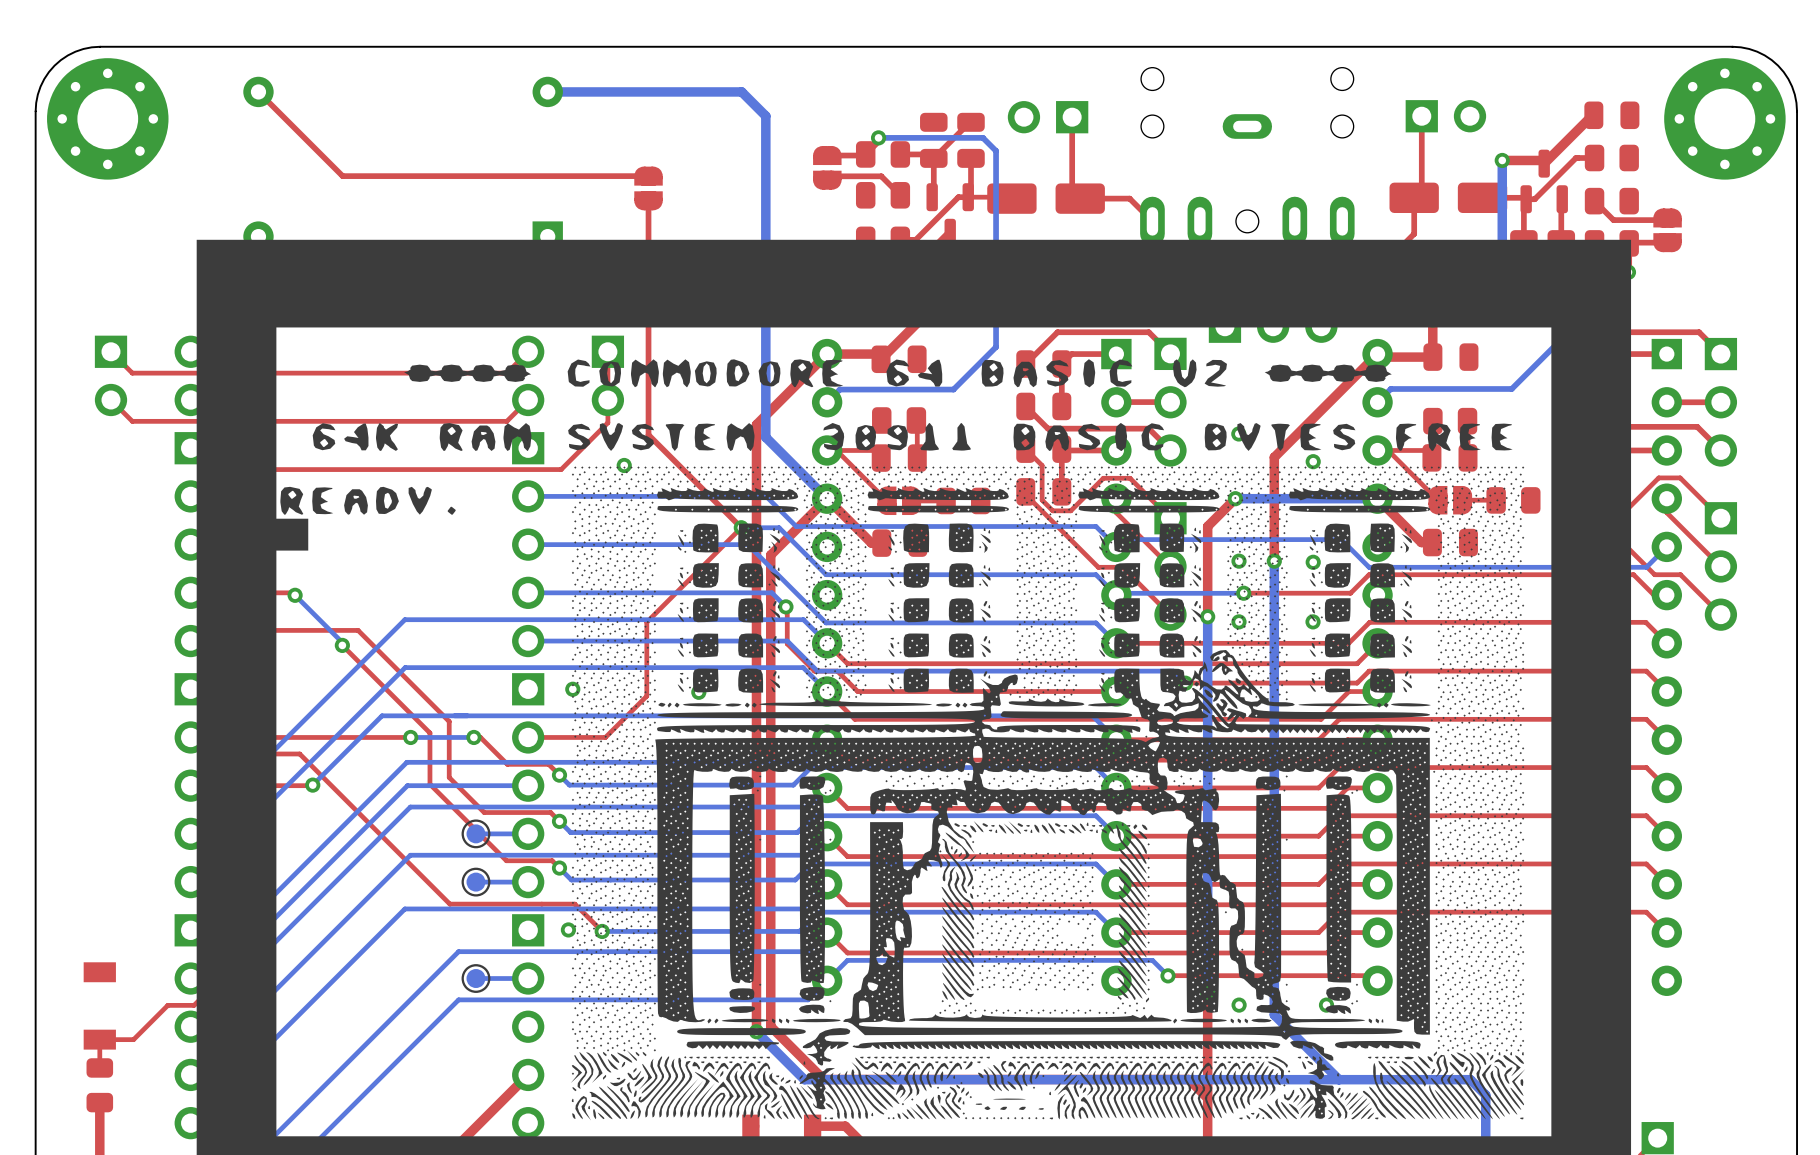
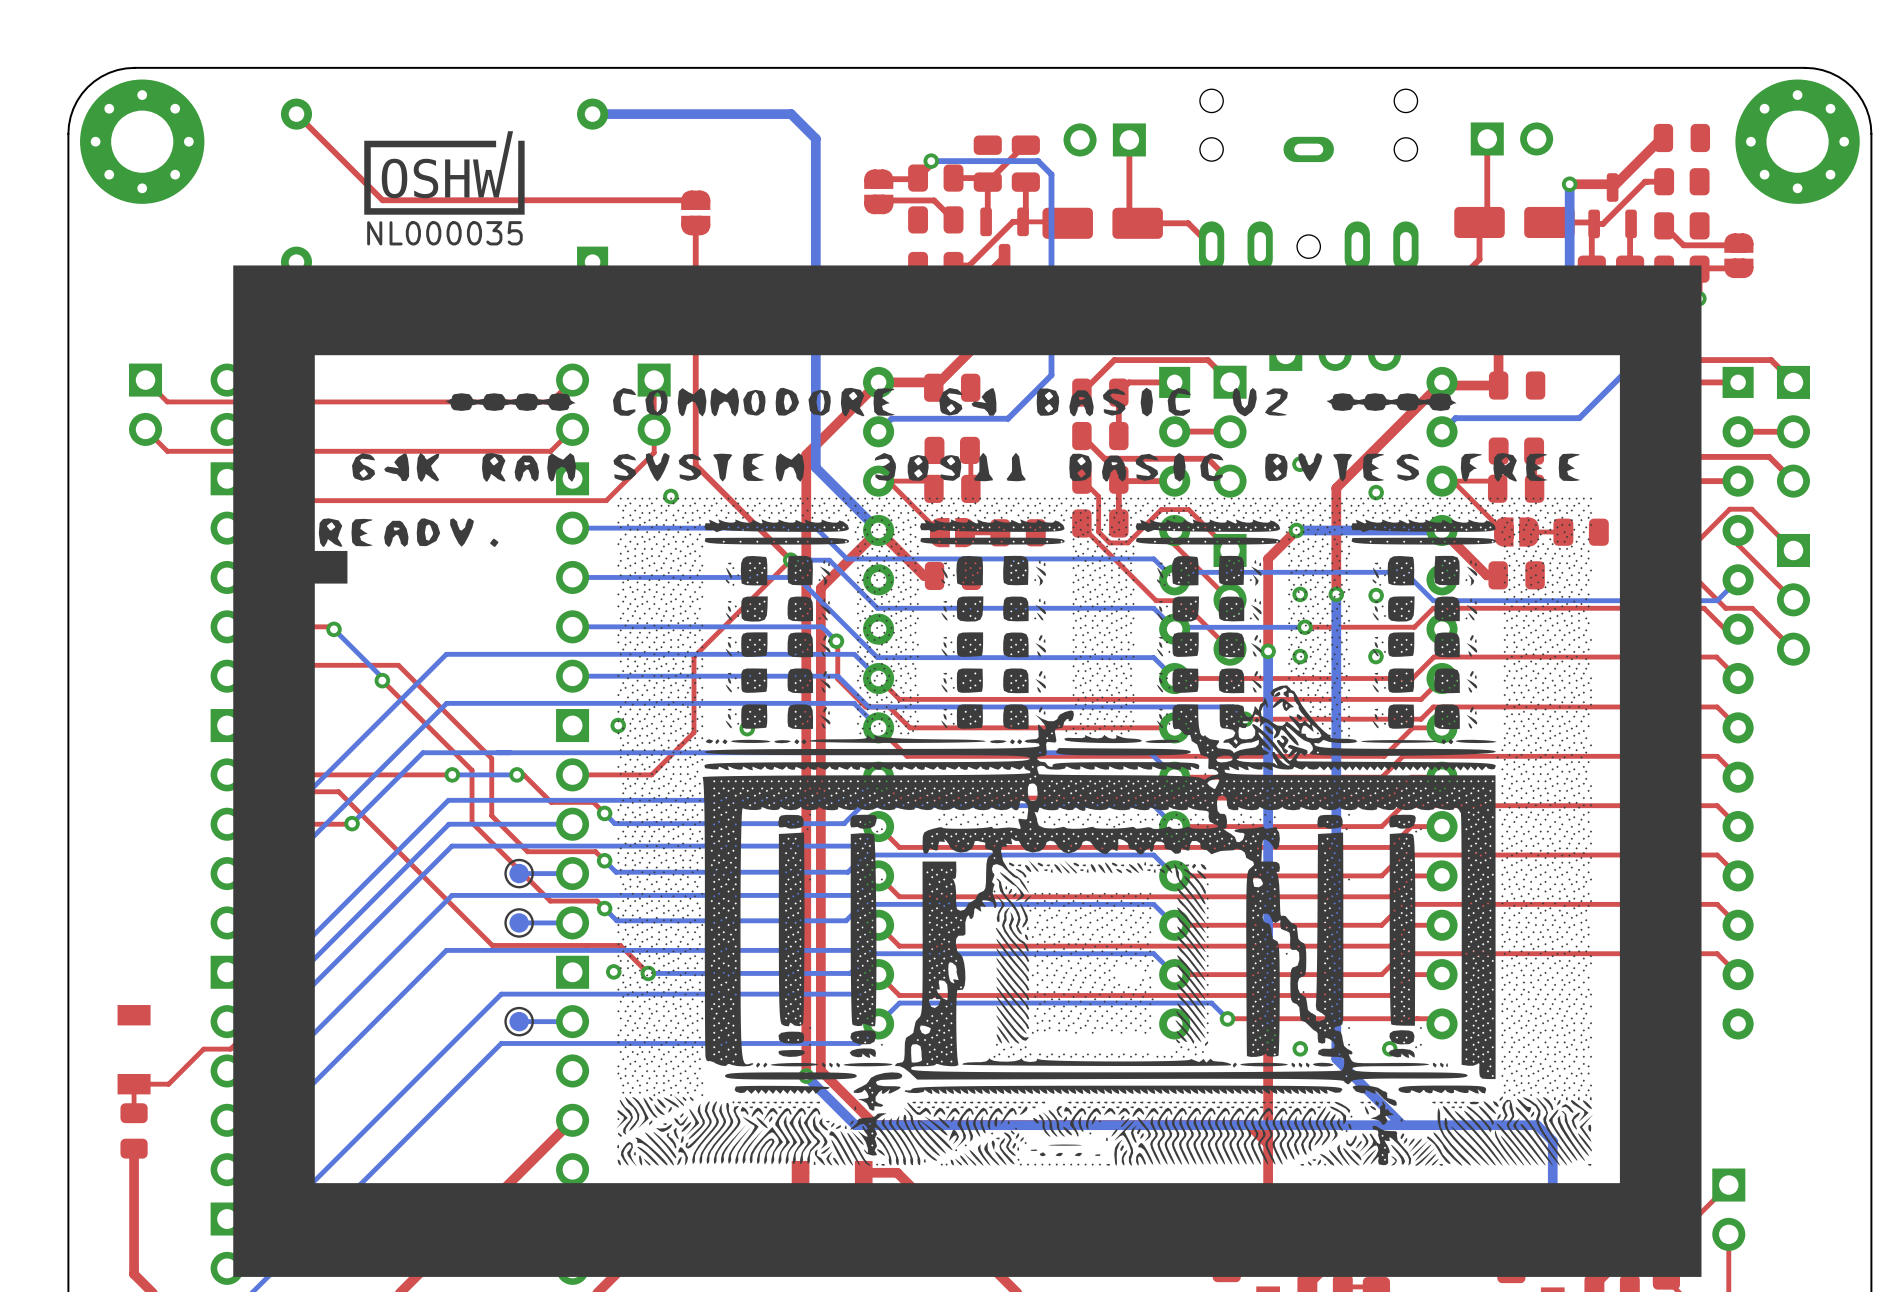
drawing: none -> [364, 131, 525, 215]

